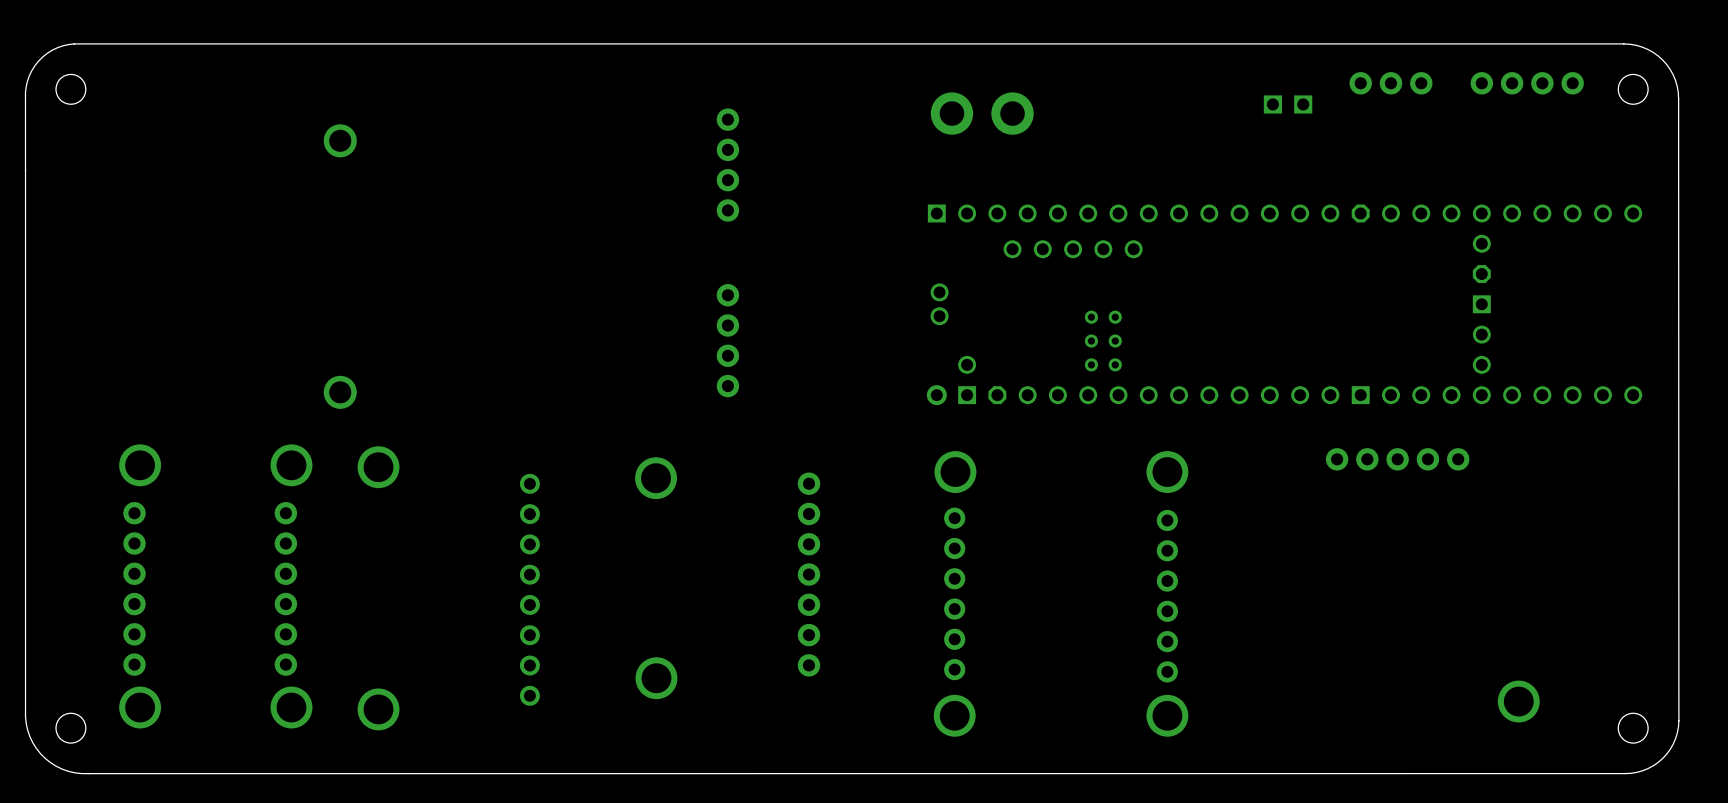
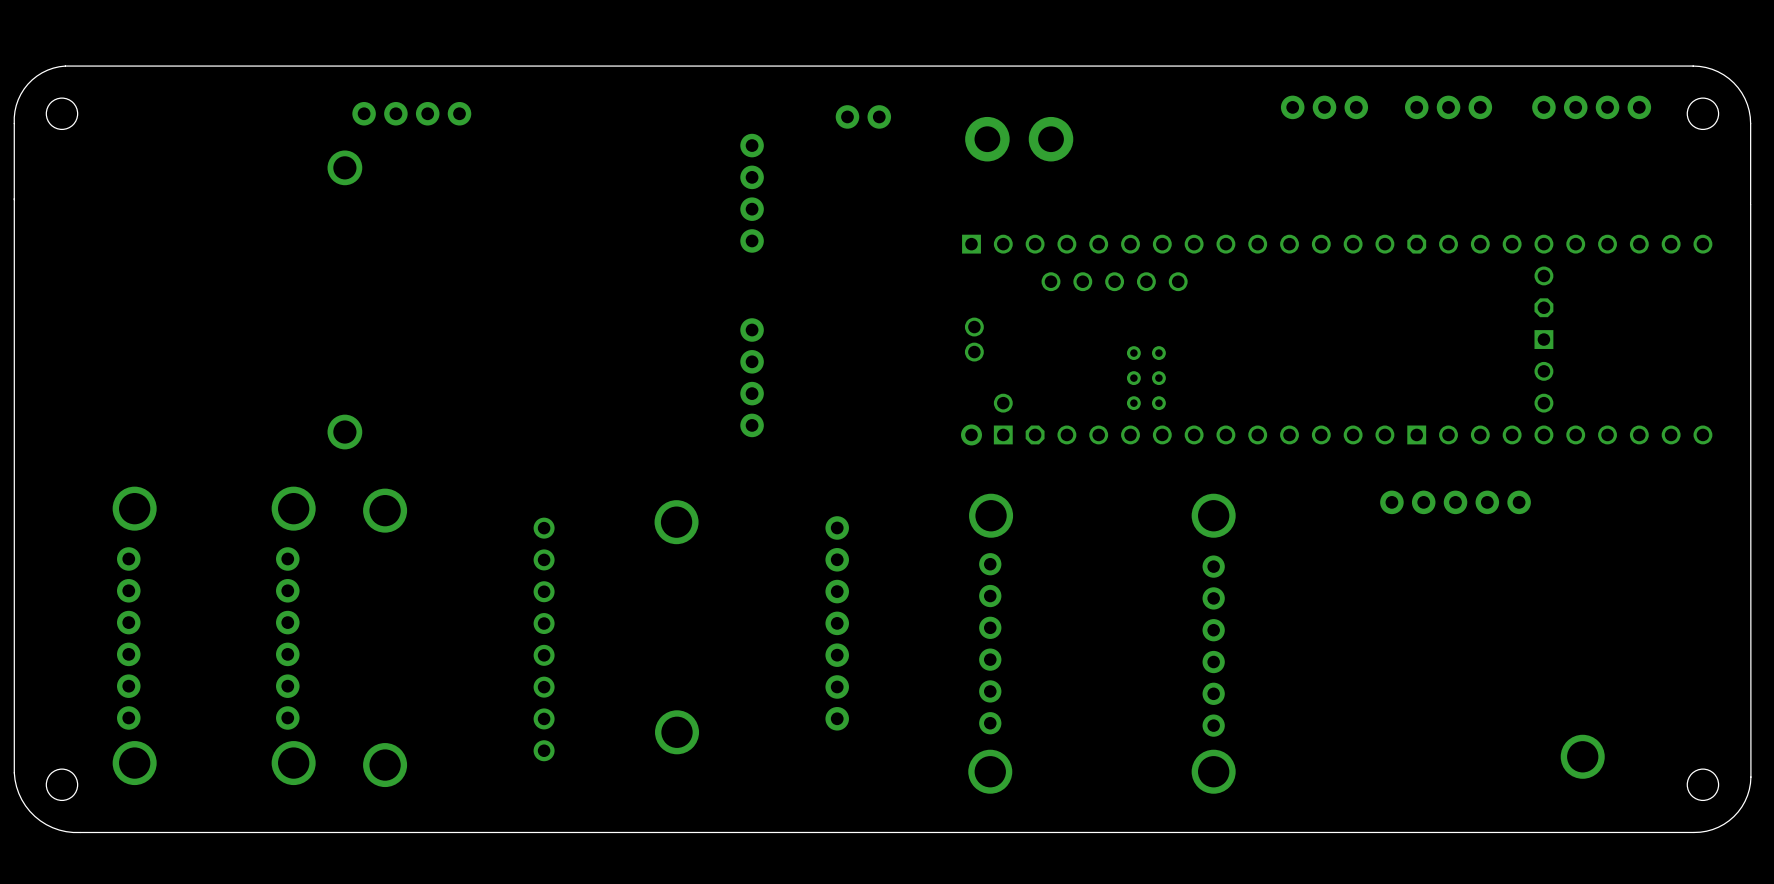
part: none -> (1324, 107)
part: none -> (411, 113)
part: none -> (863, 116)
part: (1288, 104) -> none

